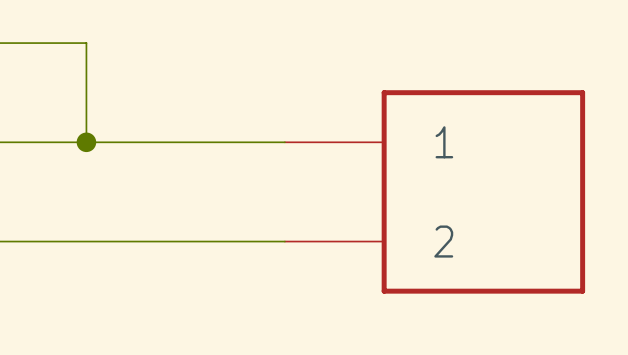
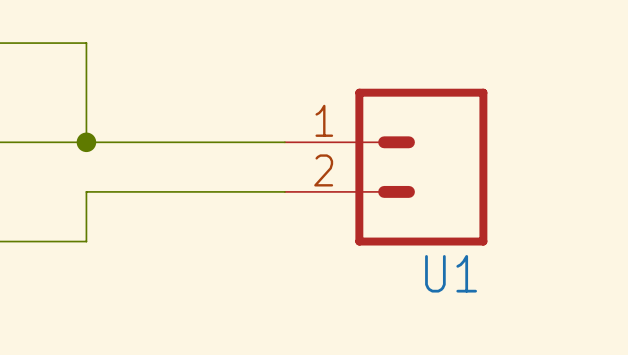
U1: none -> (386, 167)
part: (435, 191) -> none
wire: (86, 241) (284, 241) -> (86, 241) (86, 191) (284, 191)

